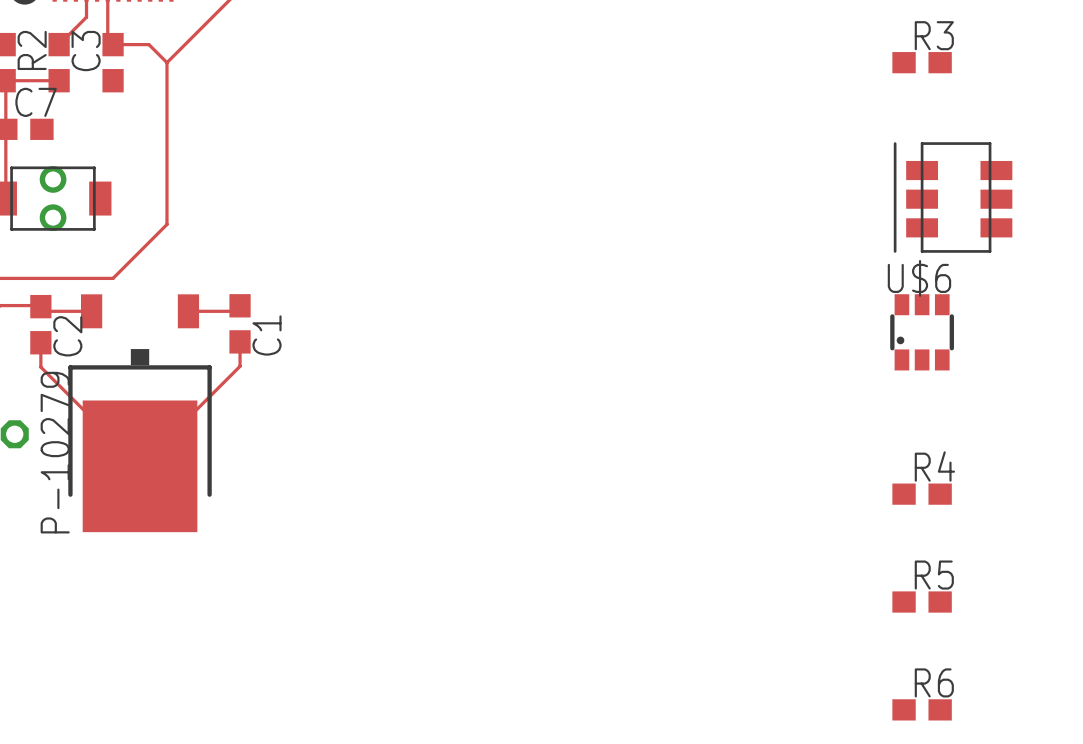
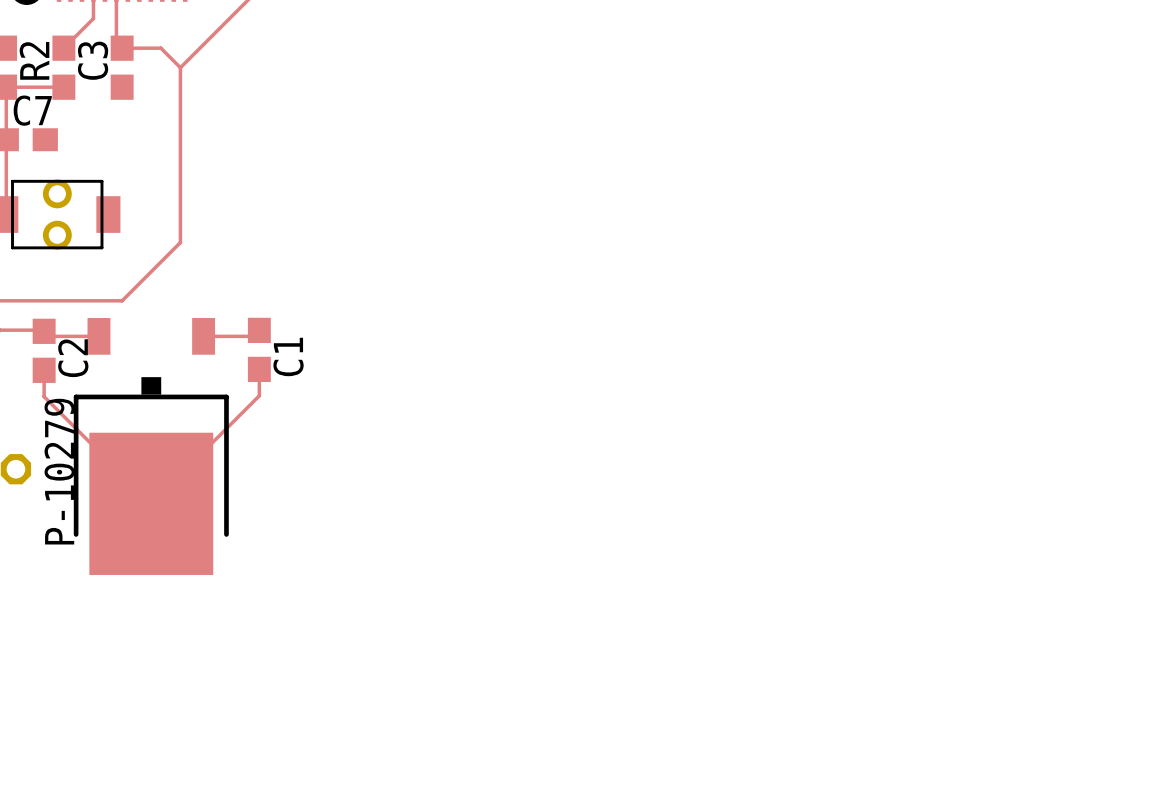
R3: (922, 62) -> none
part: (953, 197) -> none
U$6: (922, 332) -> none
R4: (922, 494) -> none
R5: (922, 602) -> none
R6: (922, 709) -> none

